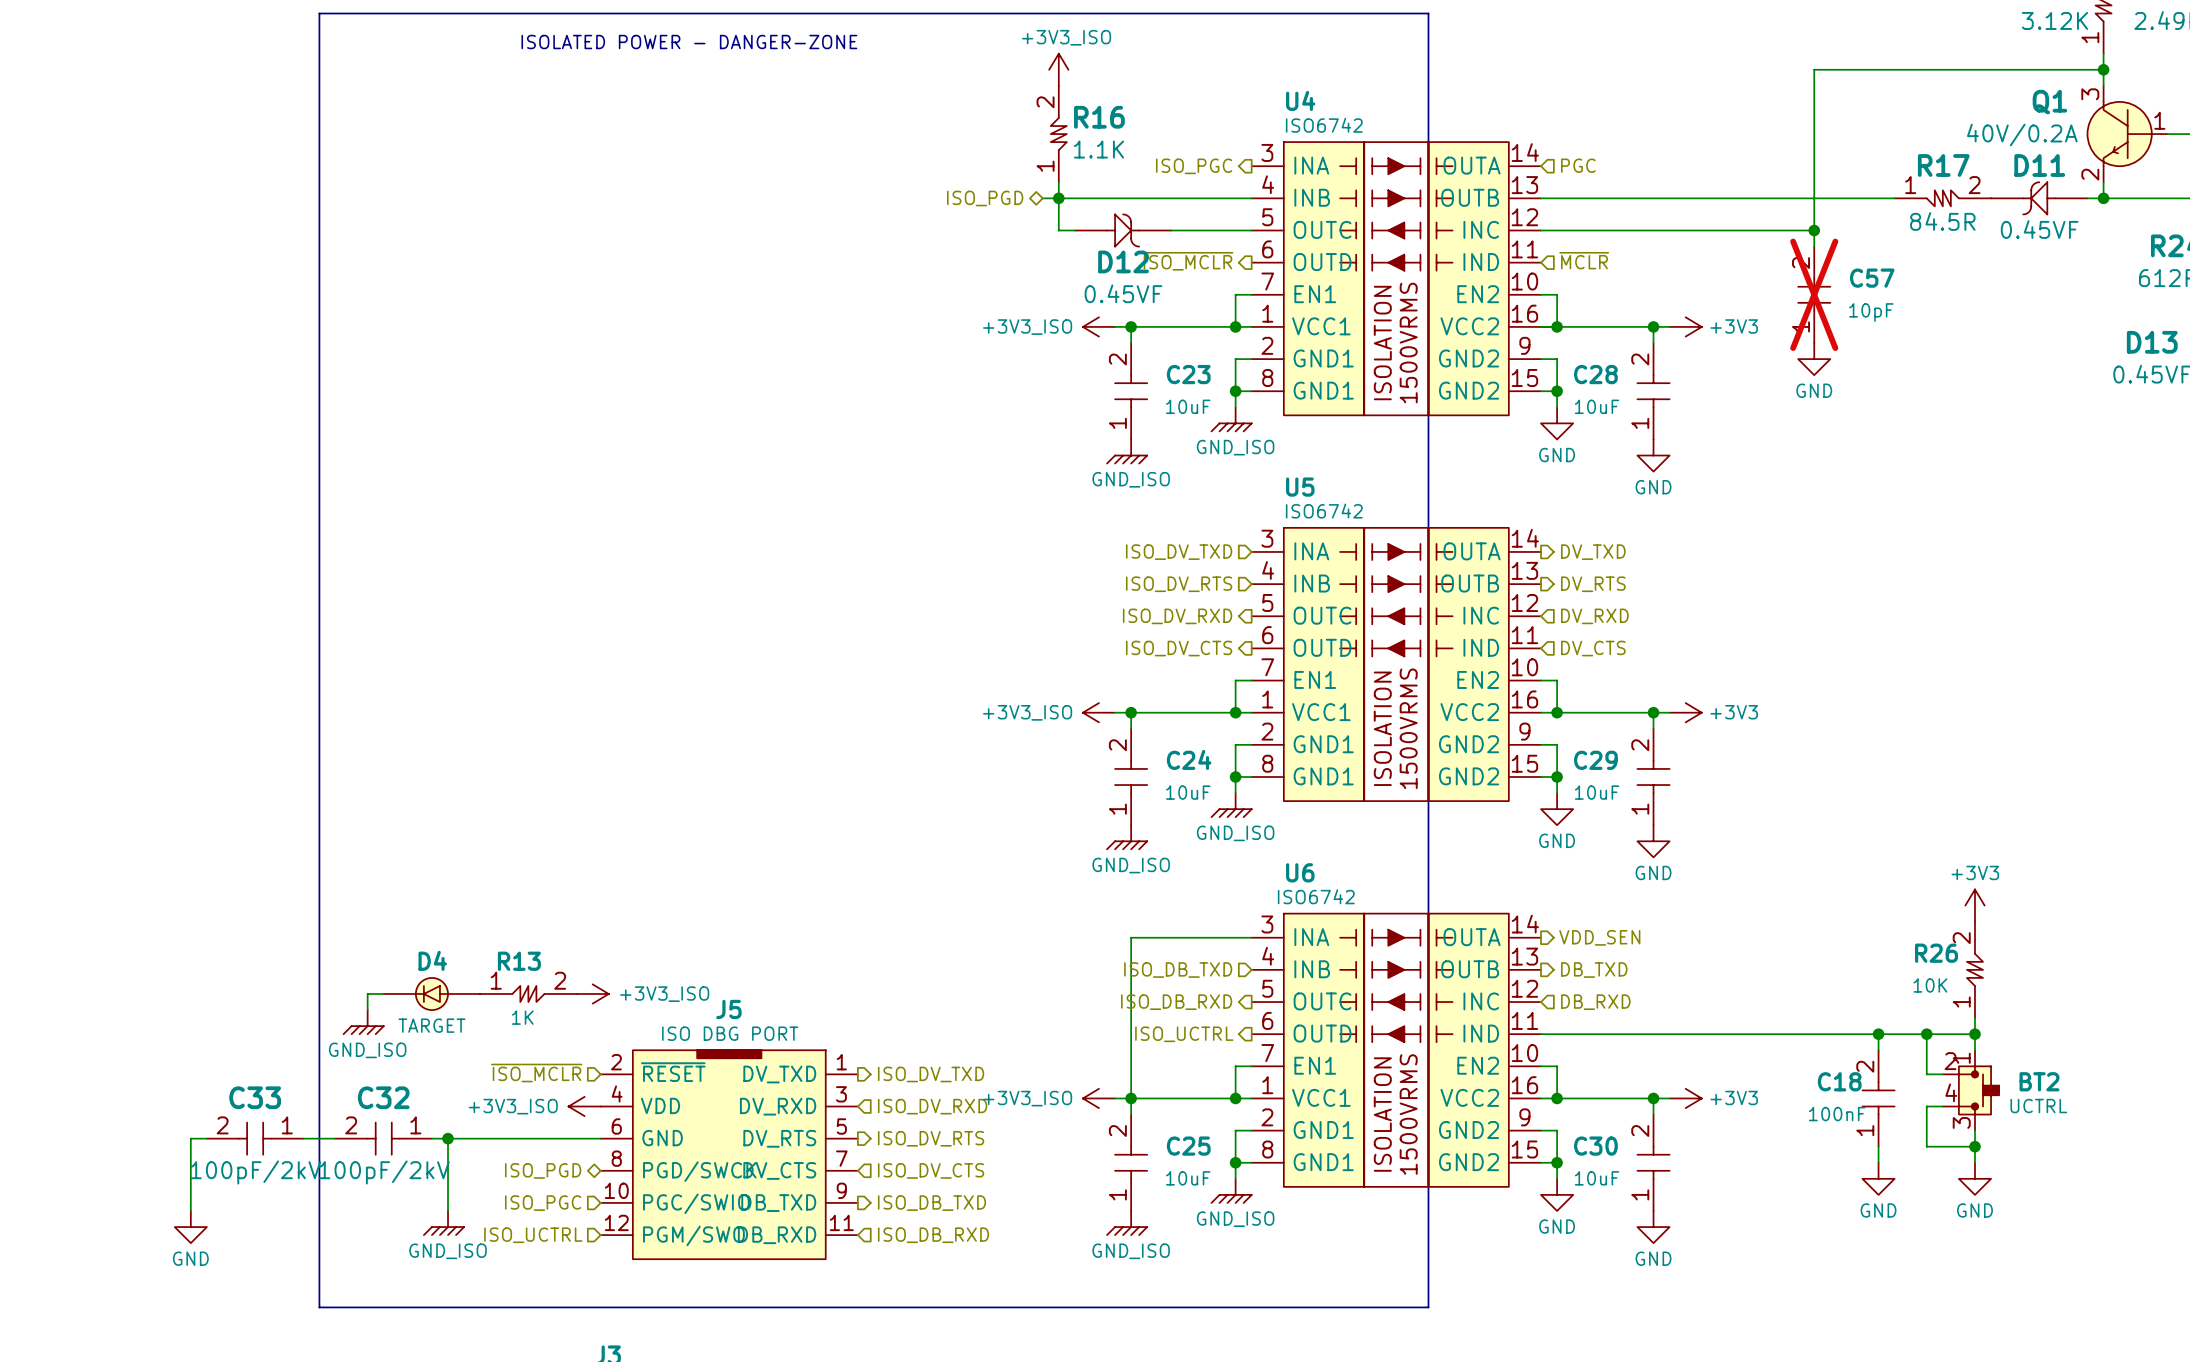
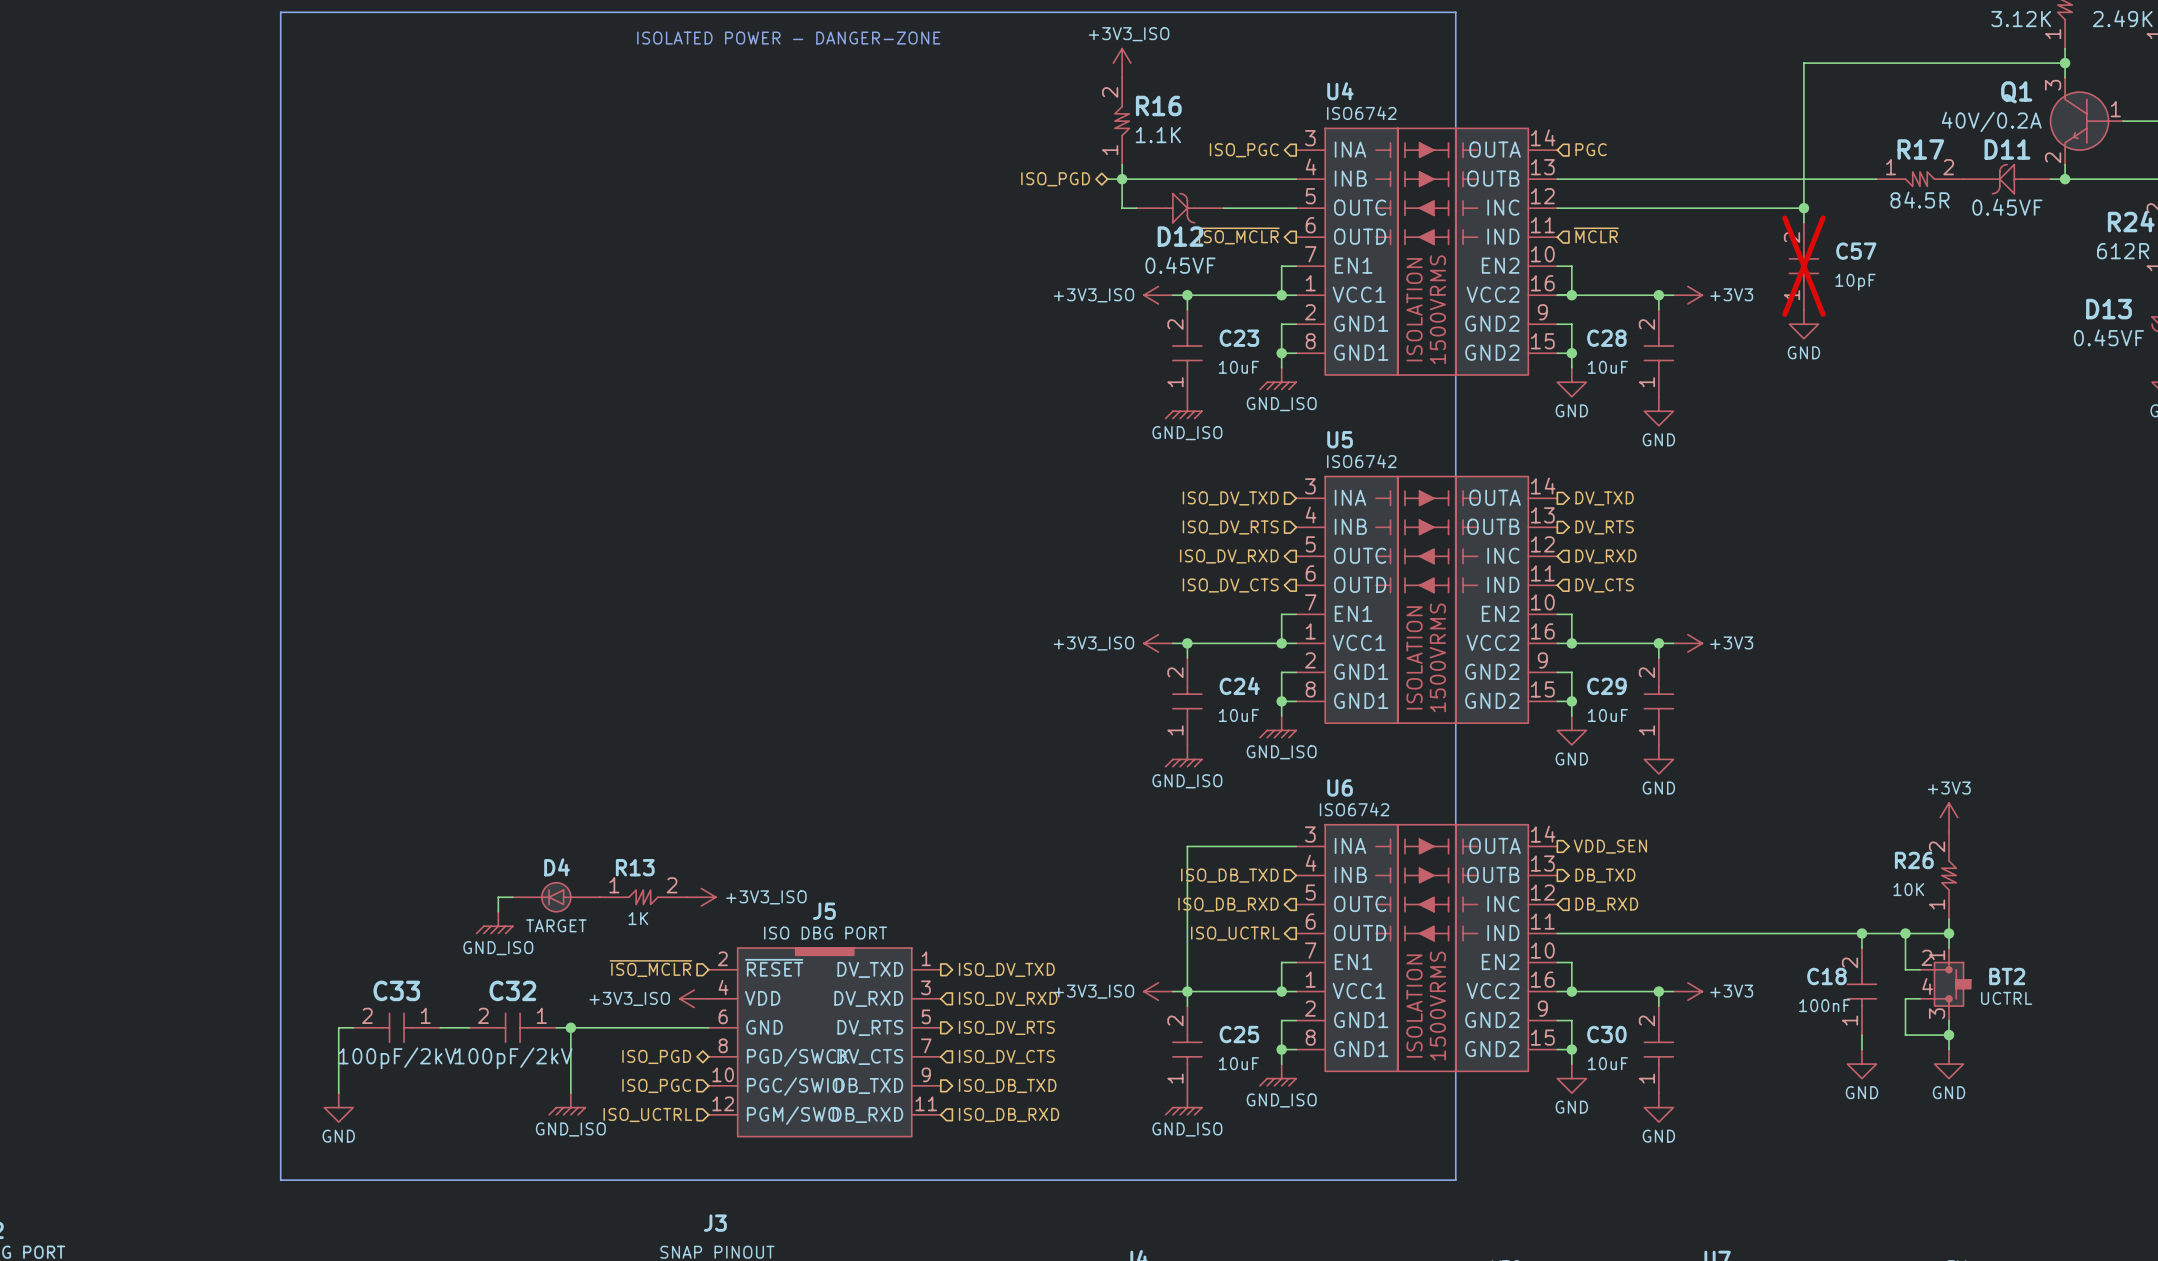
line: (319, 13) (319, 1307) -> (454, 12) (280, 12) (280, 1180) (454, 1180)

